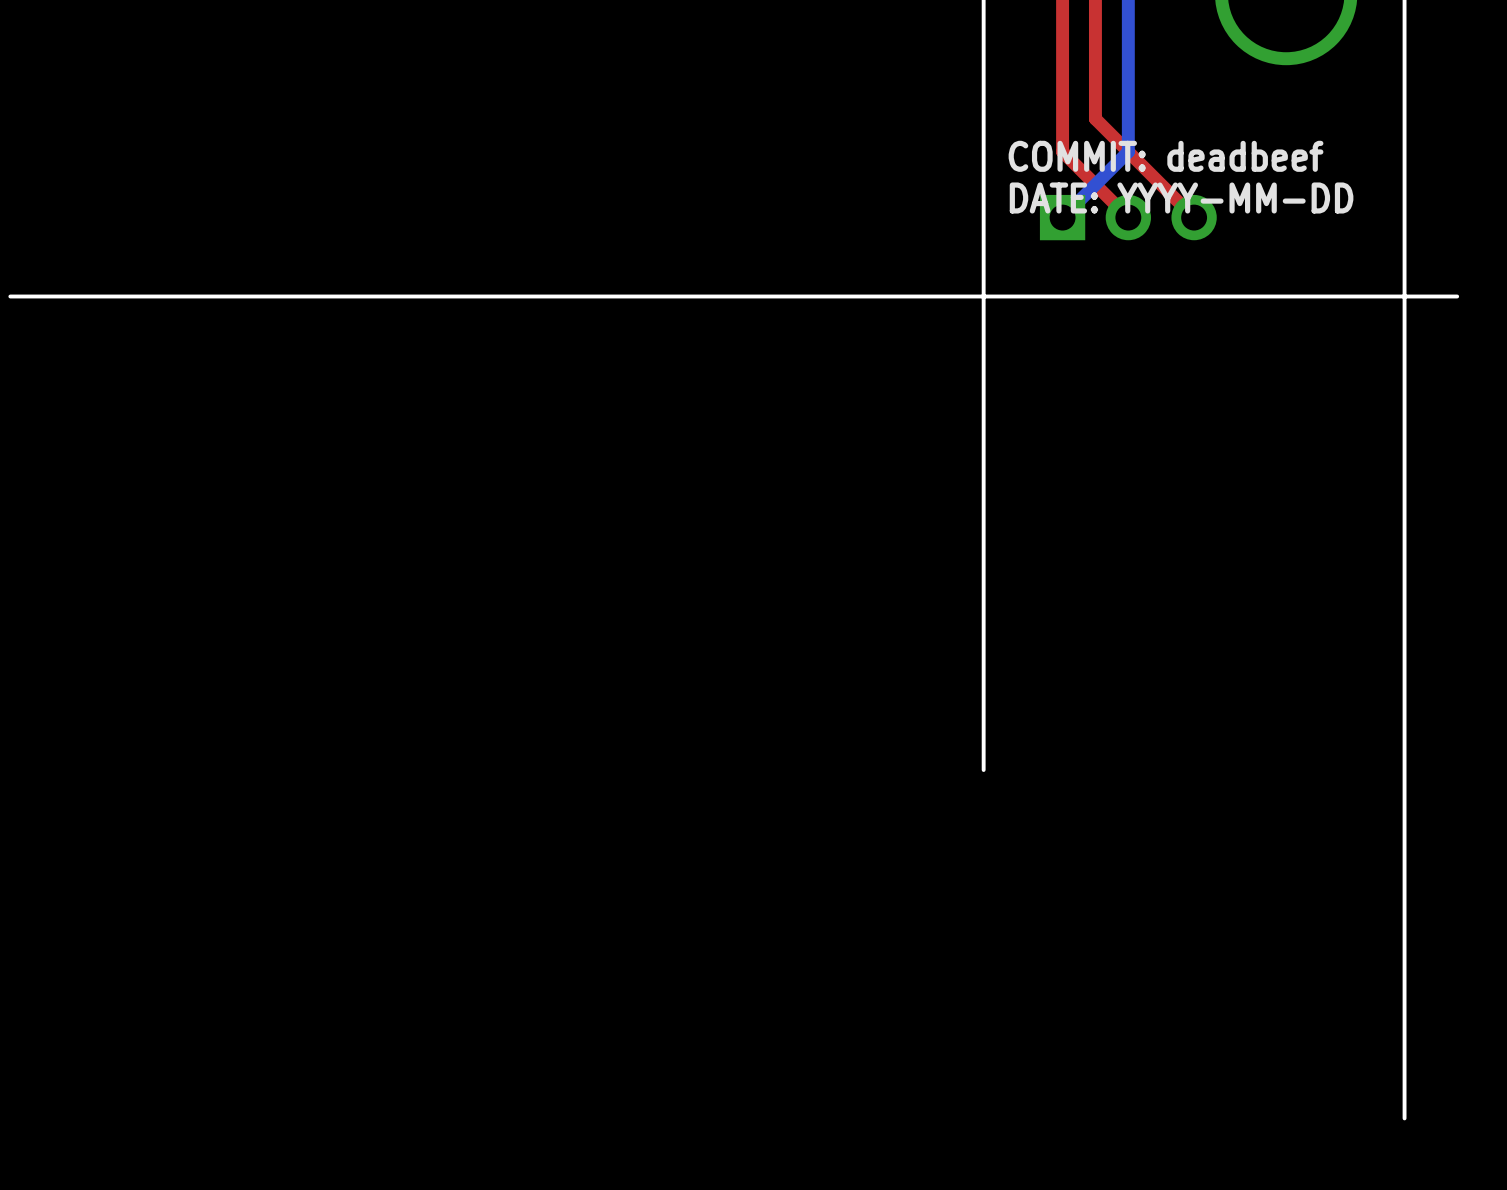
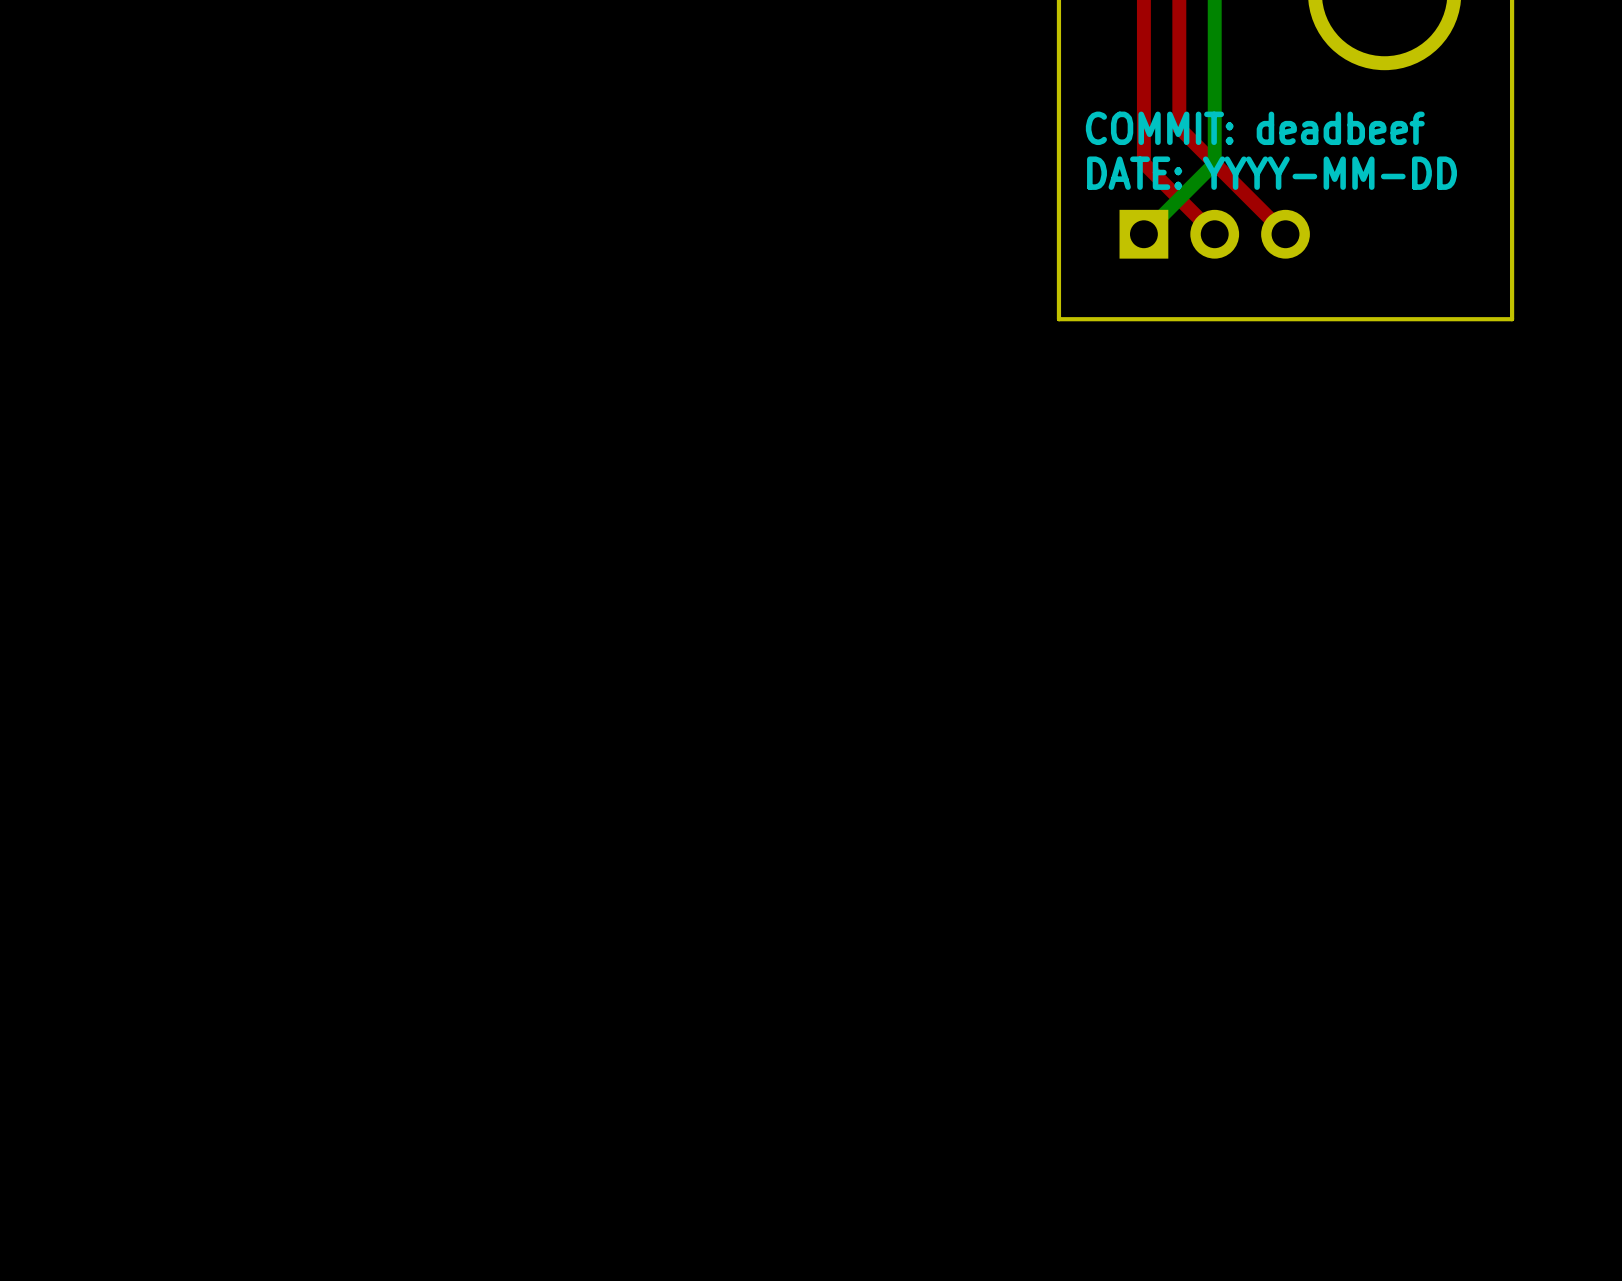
text position: COMMIT: deadbeef (1166, 156) -> COMMIT: deadbeef (1255, 128)
text position: DATE: YYYY-MM-DD (1181, 198) -> DATE: YYYY-MM-DD (1272, 173)
board edge: (10, 296) (983, 296) (983, 770) -> none
board edge: (1457, 296) (1404, 296) (1404, 1118) -> none

